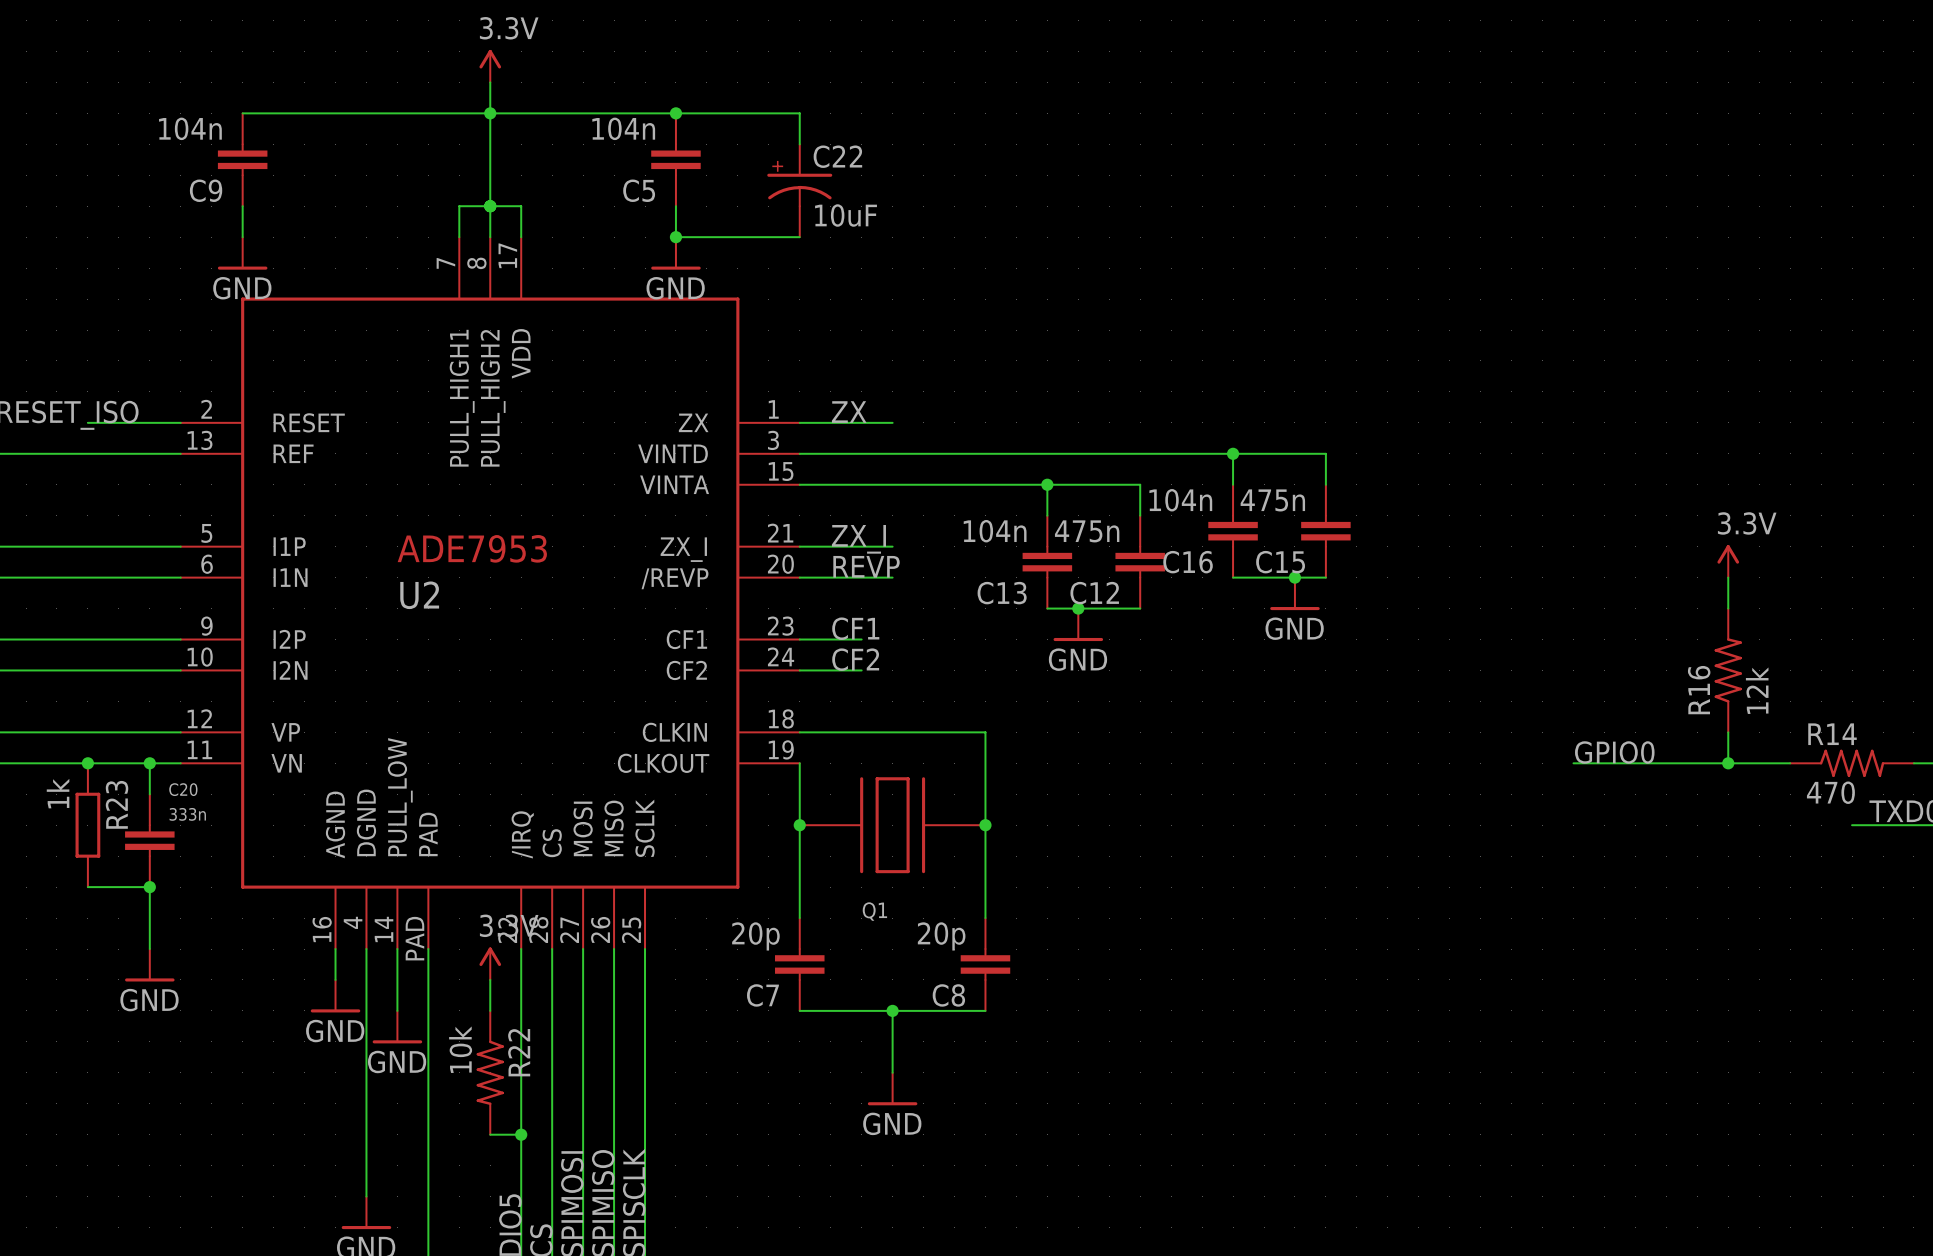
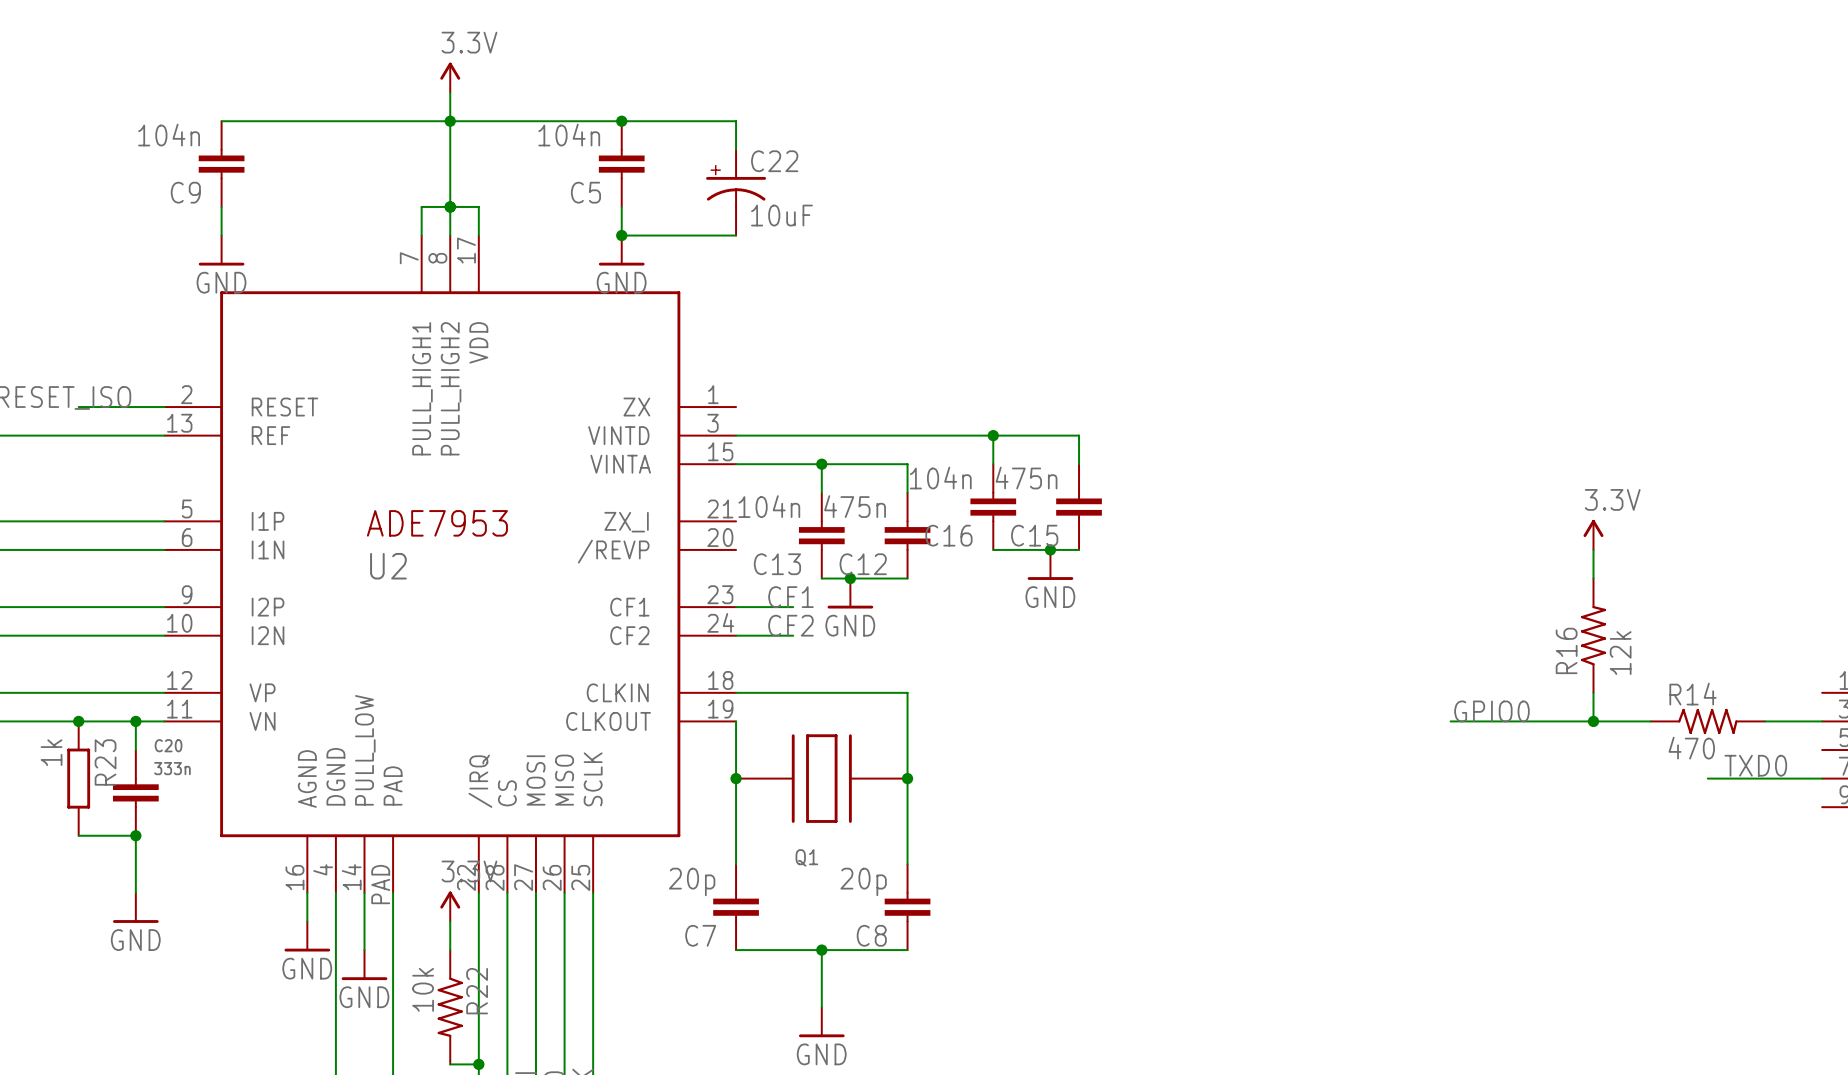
label: ZX (849, 412) -> none
wire: (799, 422) (892, 422) -> none
wire: (1171, 453) (1325, 453) (1325, 484) -> (1079, 435) (1079, 464)
wire: (1233, 453) (1233, 484) -> (993, 435) (993, 464)
junction: (1233, 453) -> none
junction: none -> (821, 464)
wire: (985, 484) (1140, 484) (1140, 515) -> (907, 464) (907, 492)
wire: (1047, 484) (1047, 515) -> (821, 464) (821, 492)
junction position: (1047, 484) -> (993, 435)
C16 position: (1233, 531) -> (993, 507)
C15 position: (1325, 531) -> (1079, 507)
label: ZX_I (858, 539) -> none
wire: (799, 546) (892, 546) -> none
C13 position: (1047, 562) -> (821, 535)
C12 position: (1140, 562) -> (907, 535)
label: REVP (866, 566) -> none
wire: (799, 577) (892, 577) -> none
junction: none -> (1050, 549)
wire: (1233, 577) (1325, 577) -> (993, 549) (1079, 549)
junction: (1294, 577) -> none
power symbol: GND (1294, 593) -> none
junction: none -> (850, 578)
wire: (1047, 608) (1140, 608) -> (821, 578) (907, 578)
junction: (1078, 608) -> none
power symbol: none -> GND (850, 593)
power symbol position: GND (1078, 624) -> GND (1050, 564)

